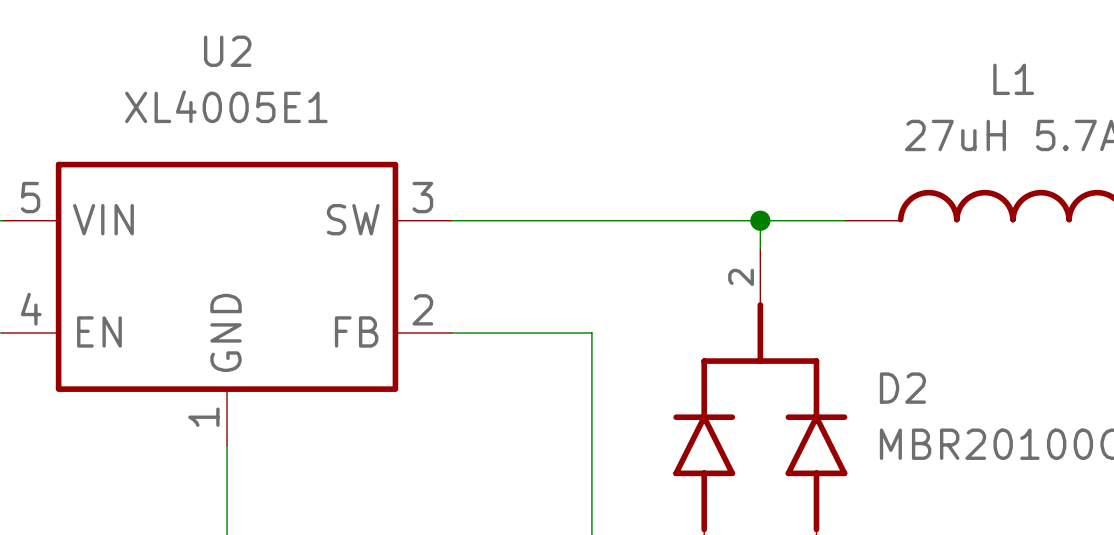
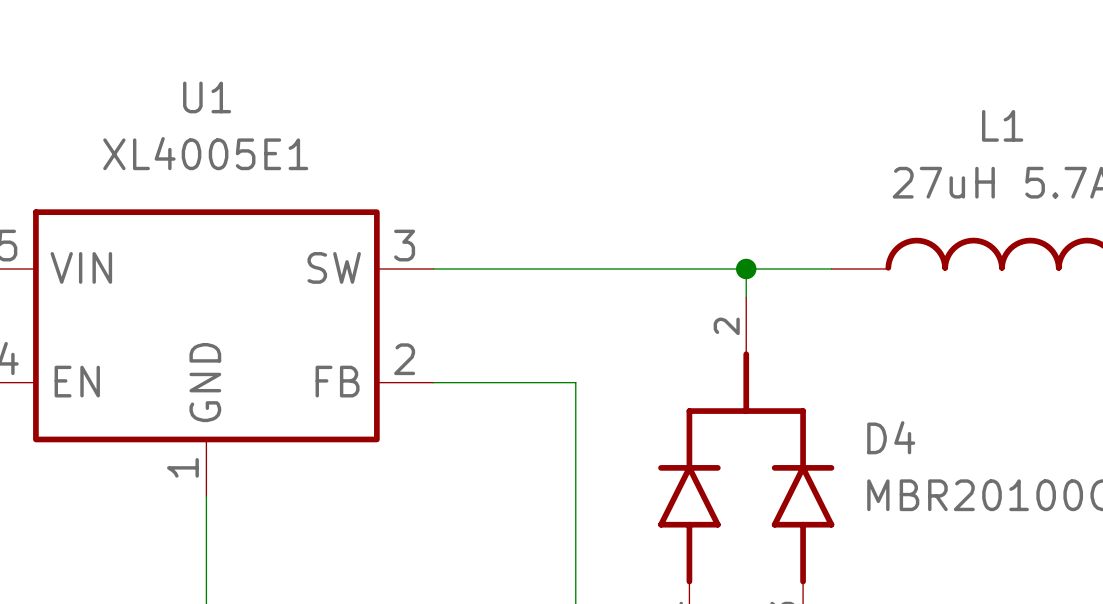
U2 name: U2 (227, 51) -> U1 (207, 97)
D2 name: D2 (902, 388) -> D4 (891, 437)

